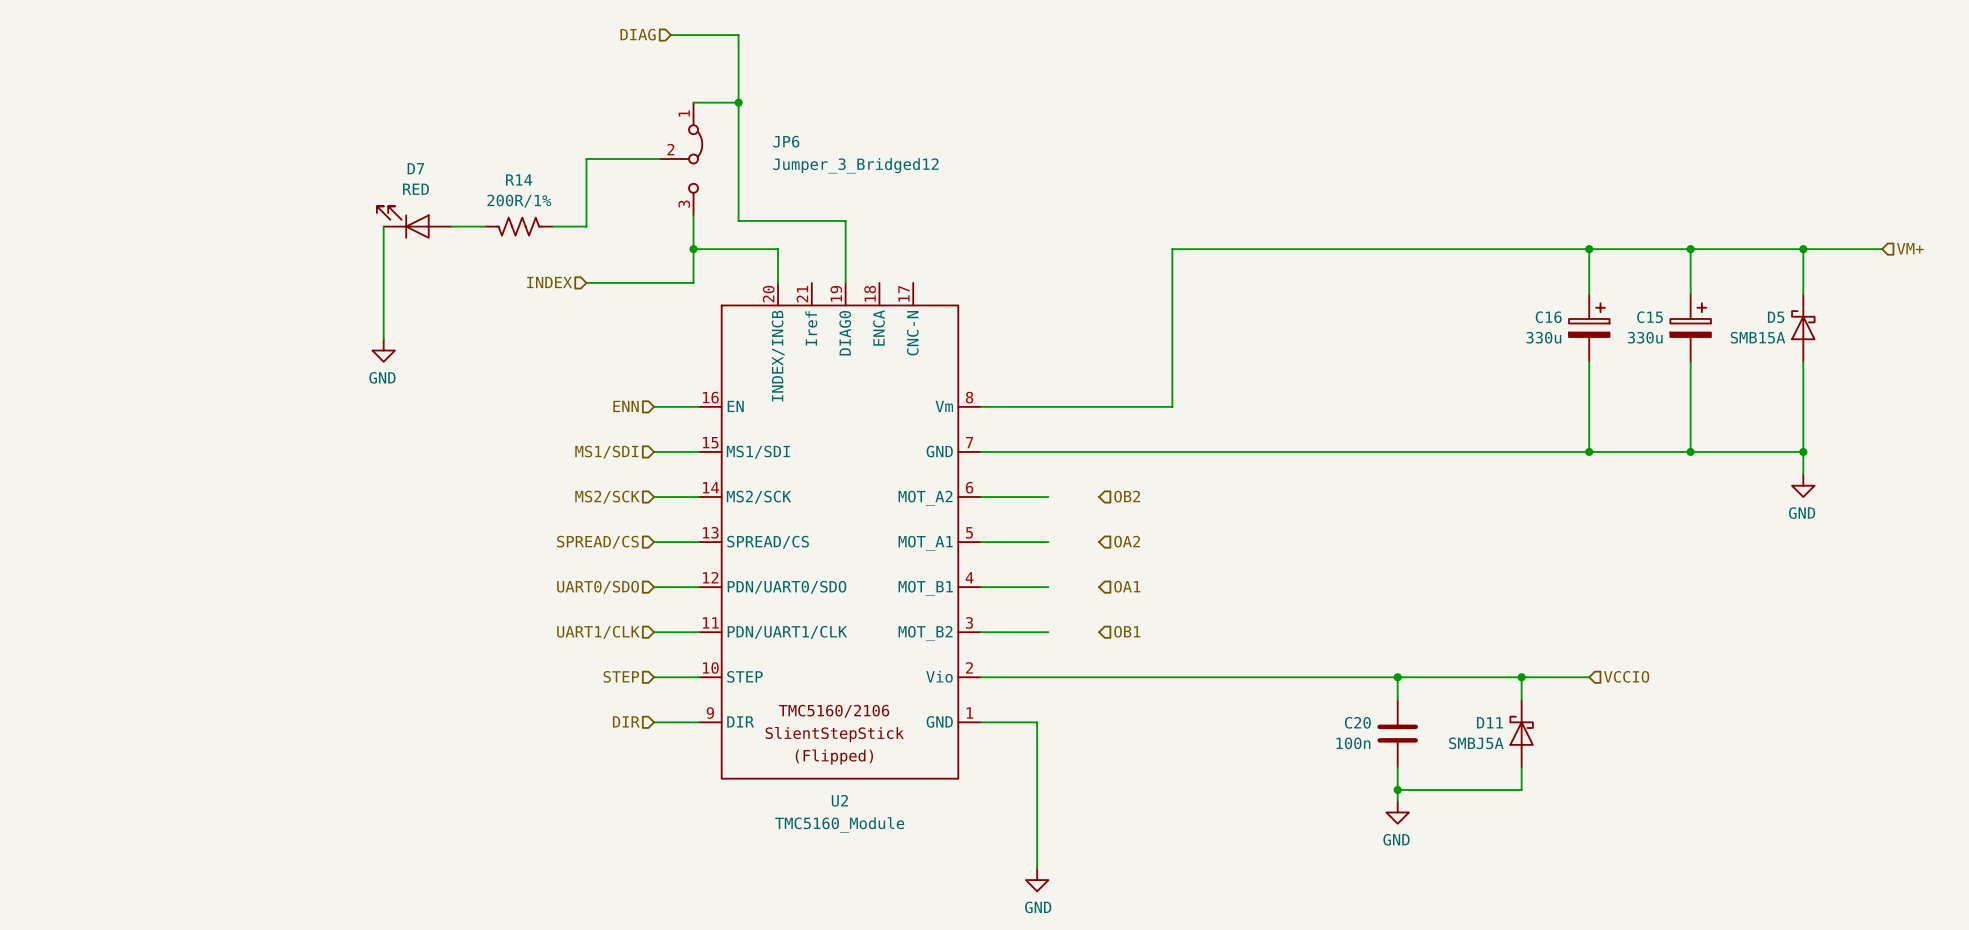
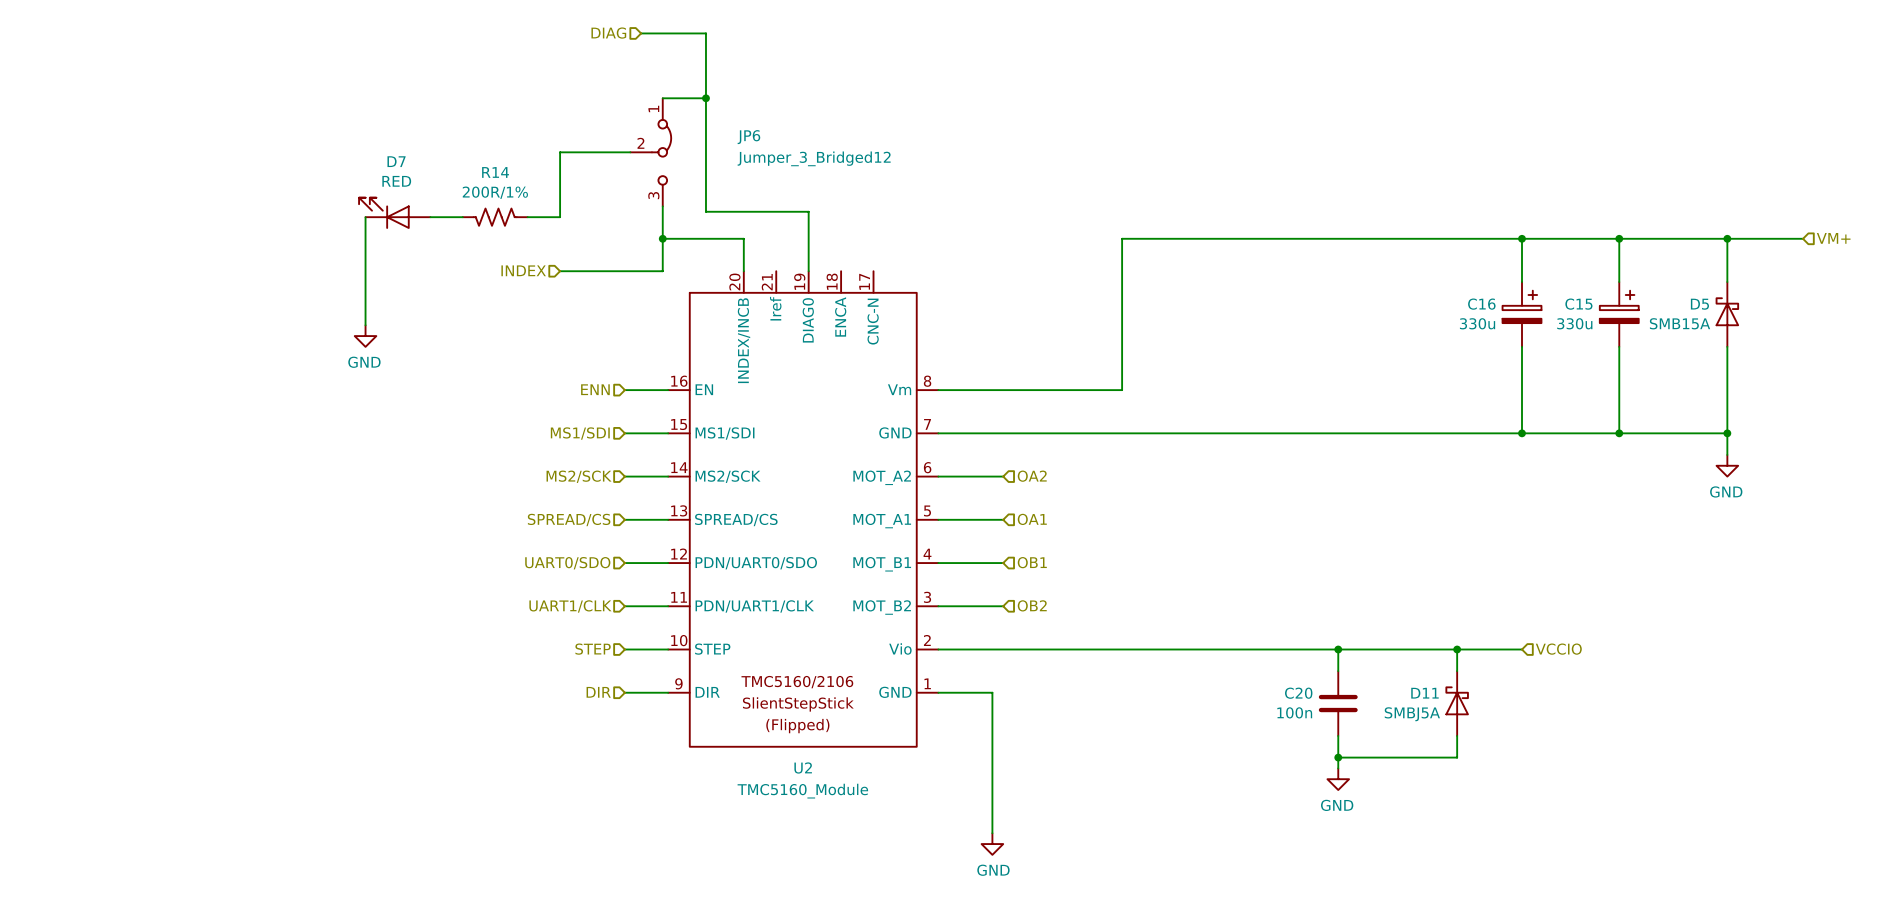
hierarchical label position: OB2 (1127, 496) -> OB2 (1032, 605)
hierarchical label position: OA2 (1127, 541) -> OA2 (1032, 476)
hierarchical label position: OA1 (1127, 586) -> OA1 (1032, 519)
hierarchical label position: OB1 (1127, 631) -> OB1 (1032, 562)

